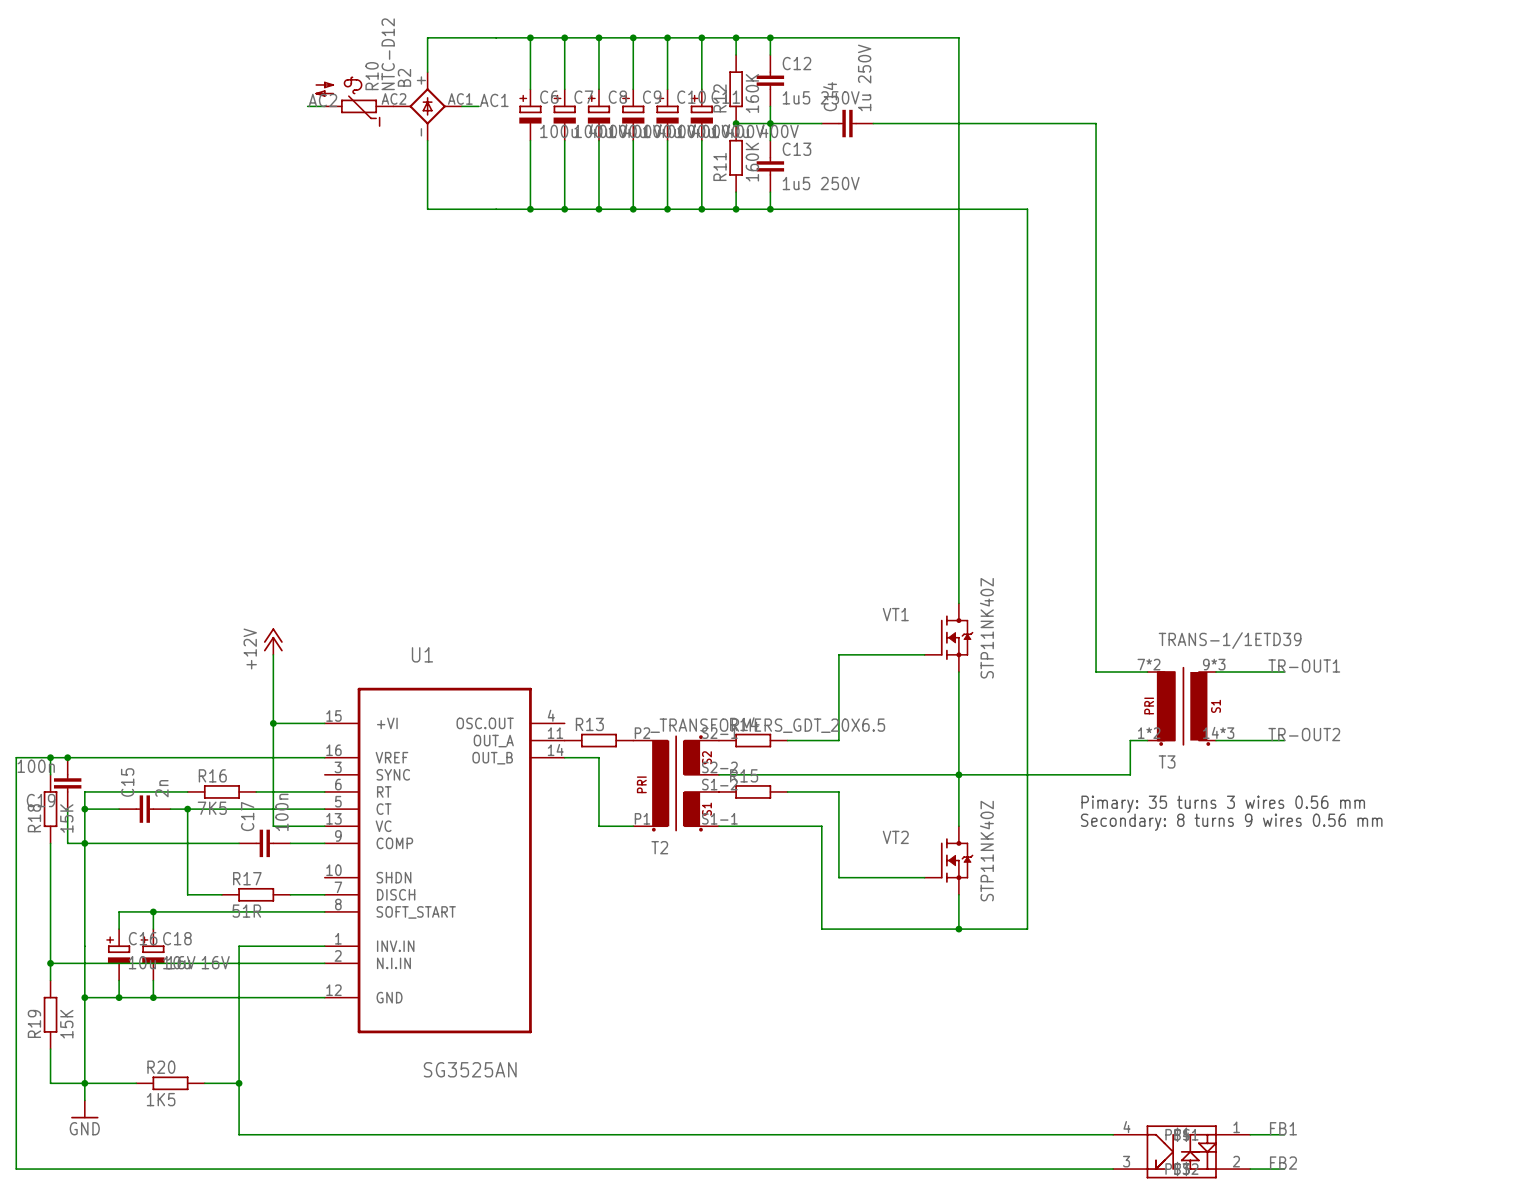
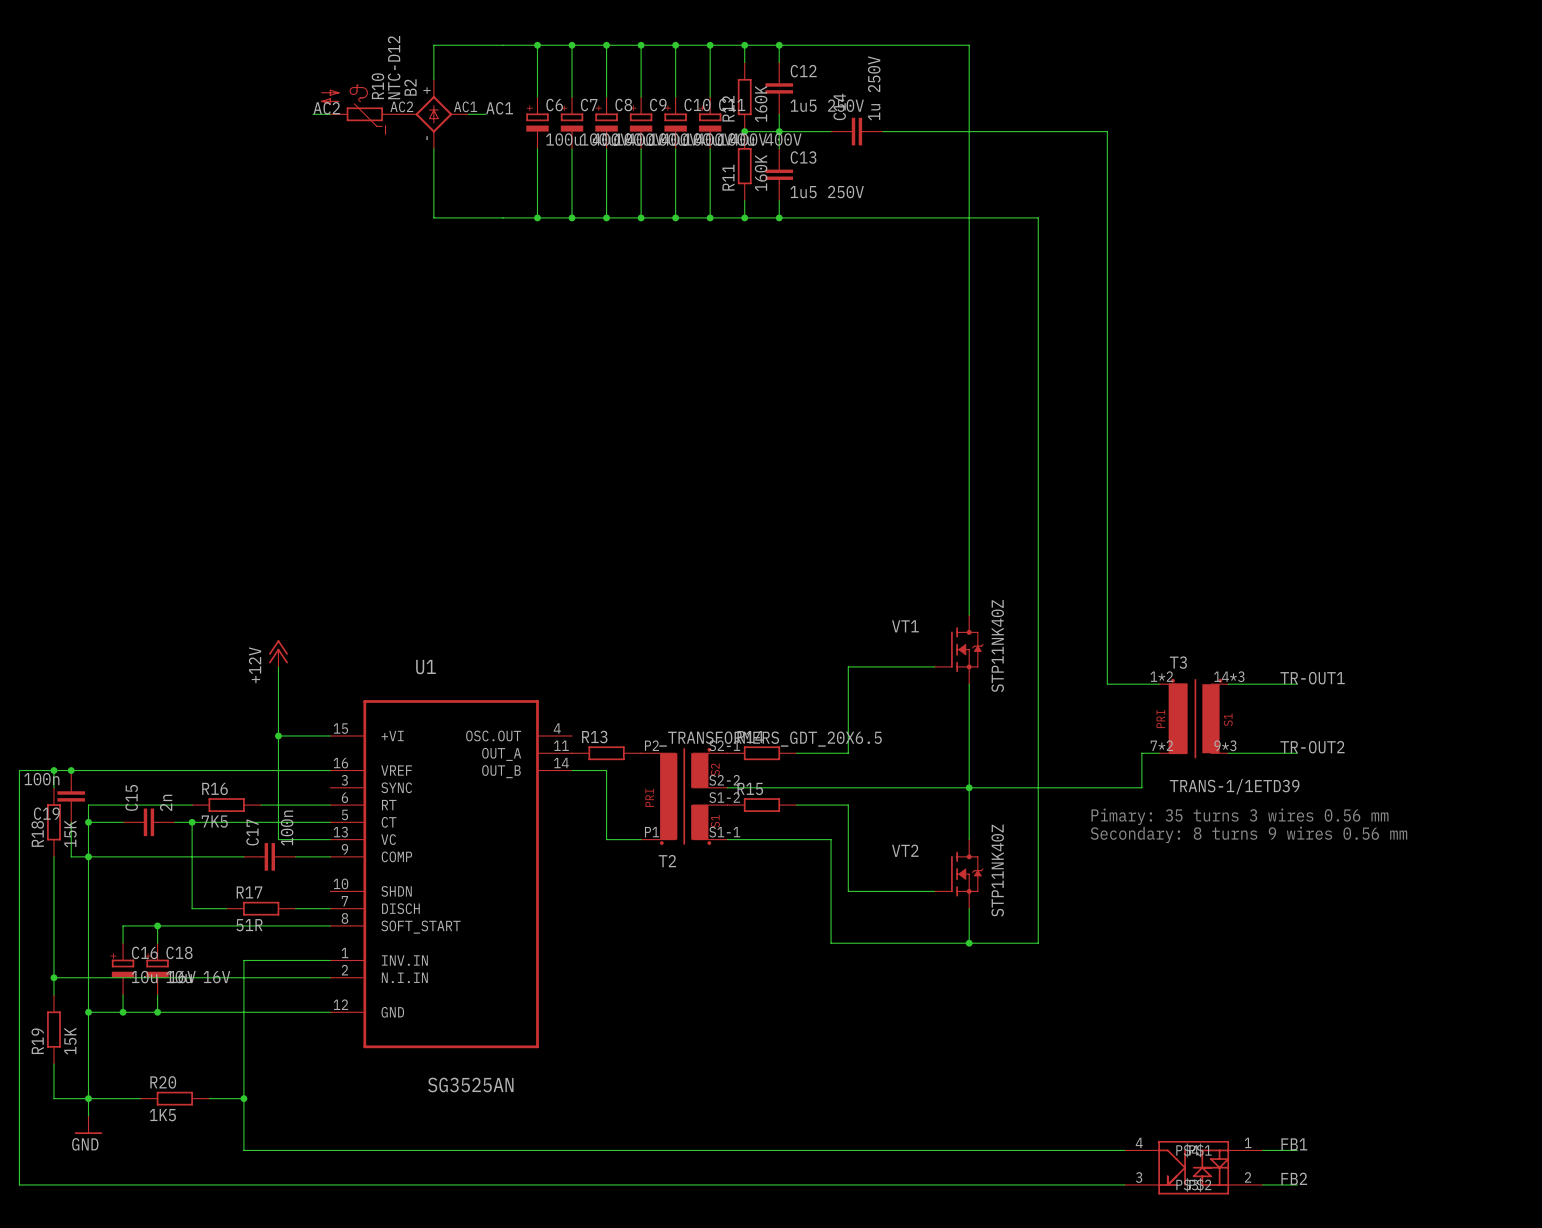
T3 flip: as is (1183, 706) -> up-down (1195, 718)

